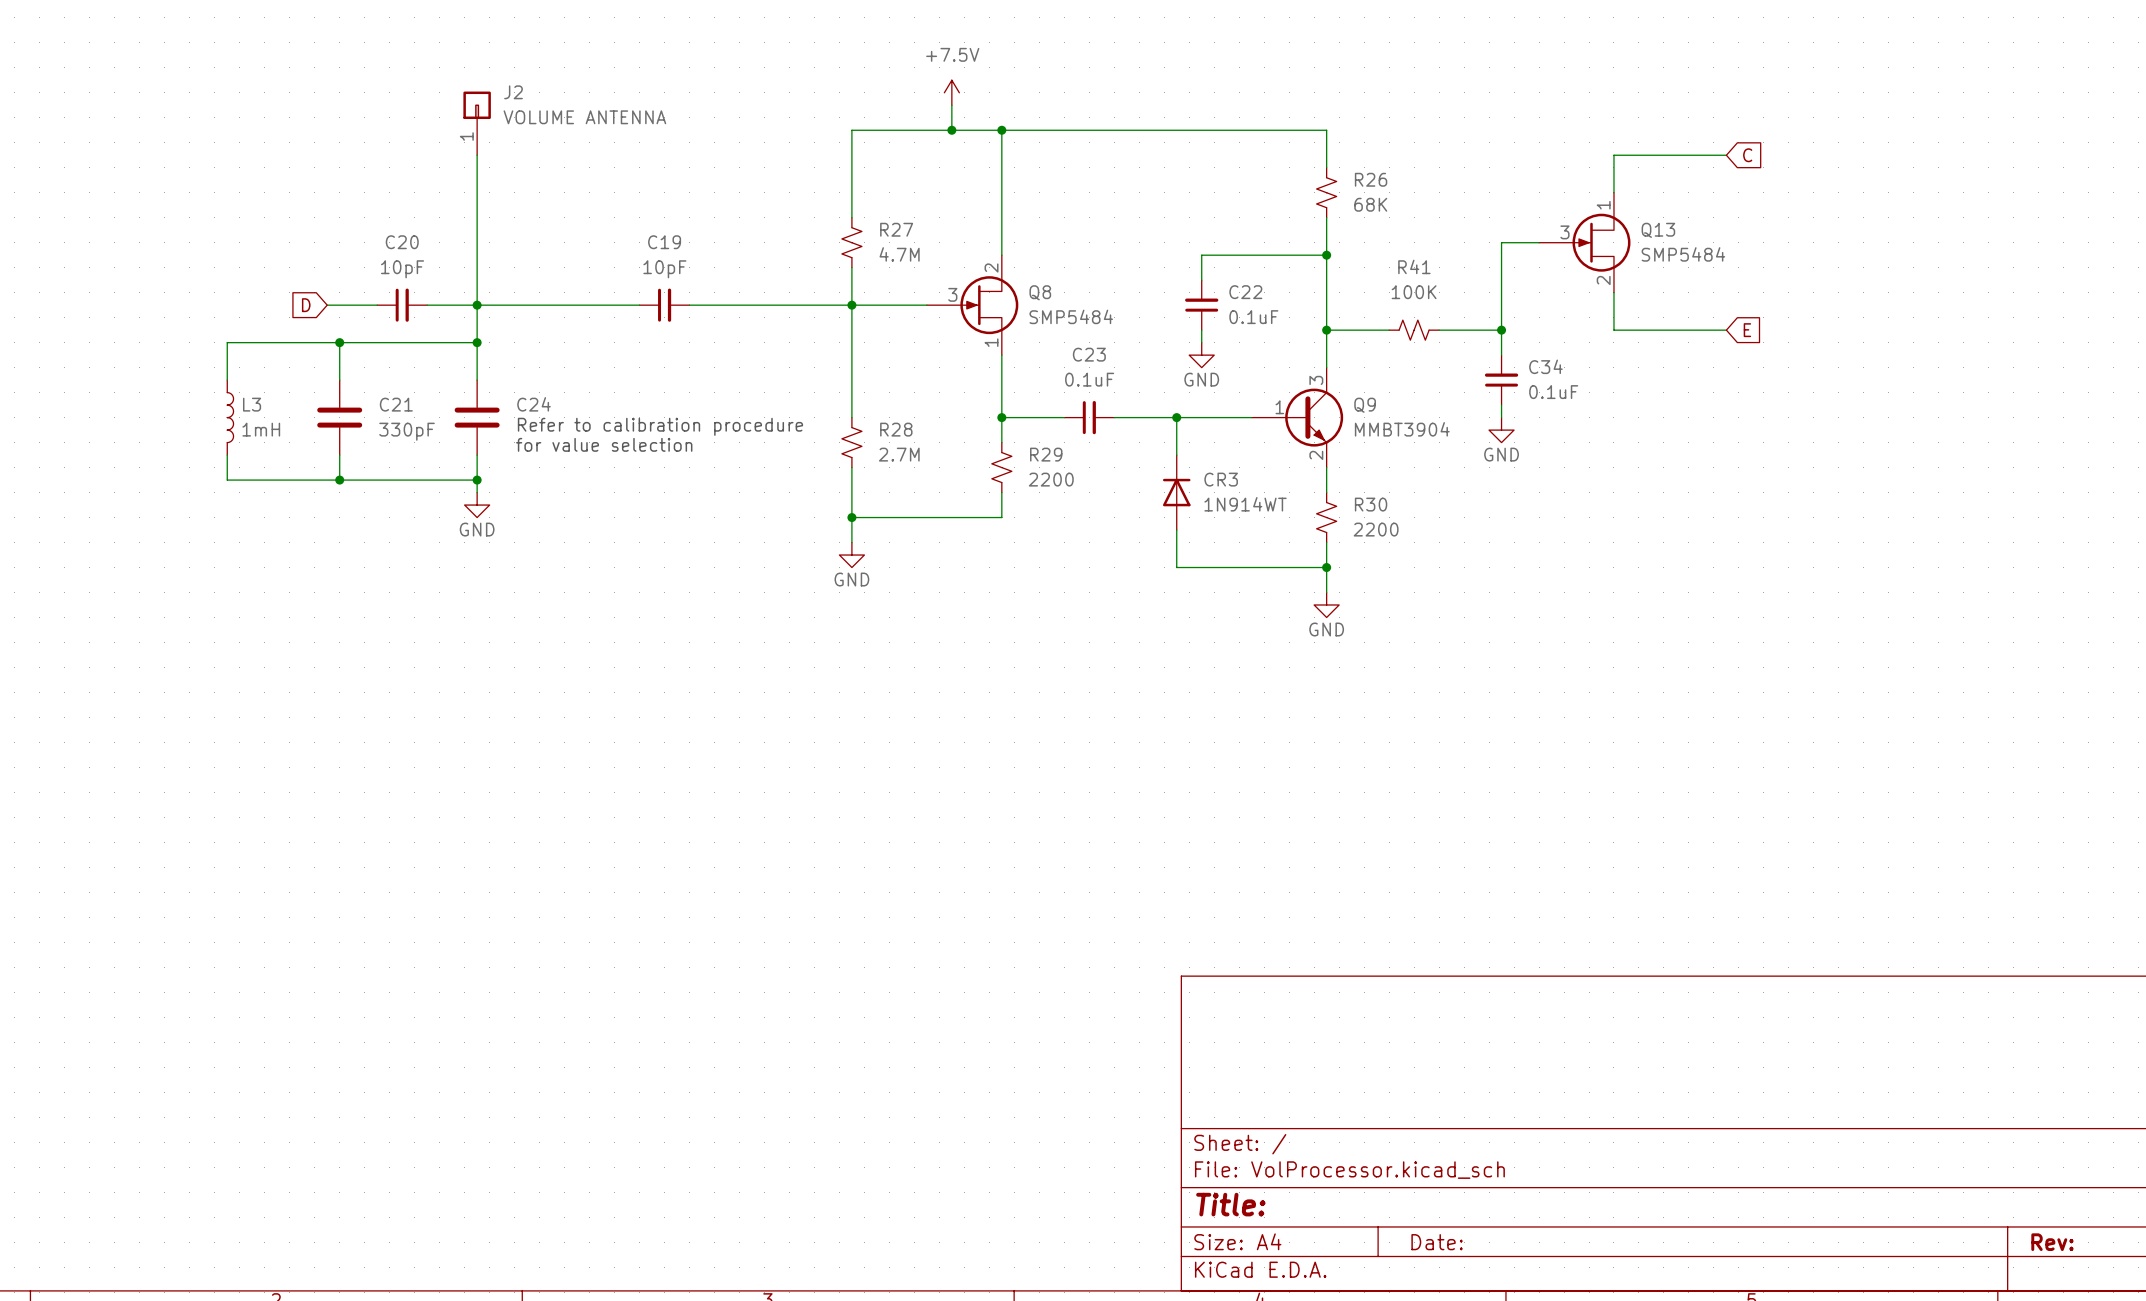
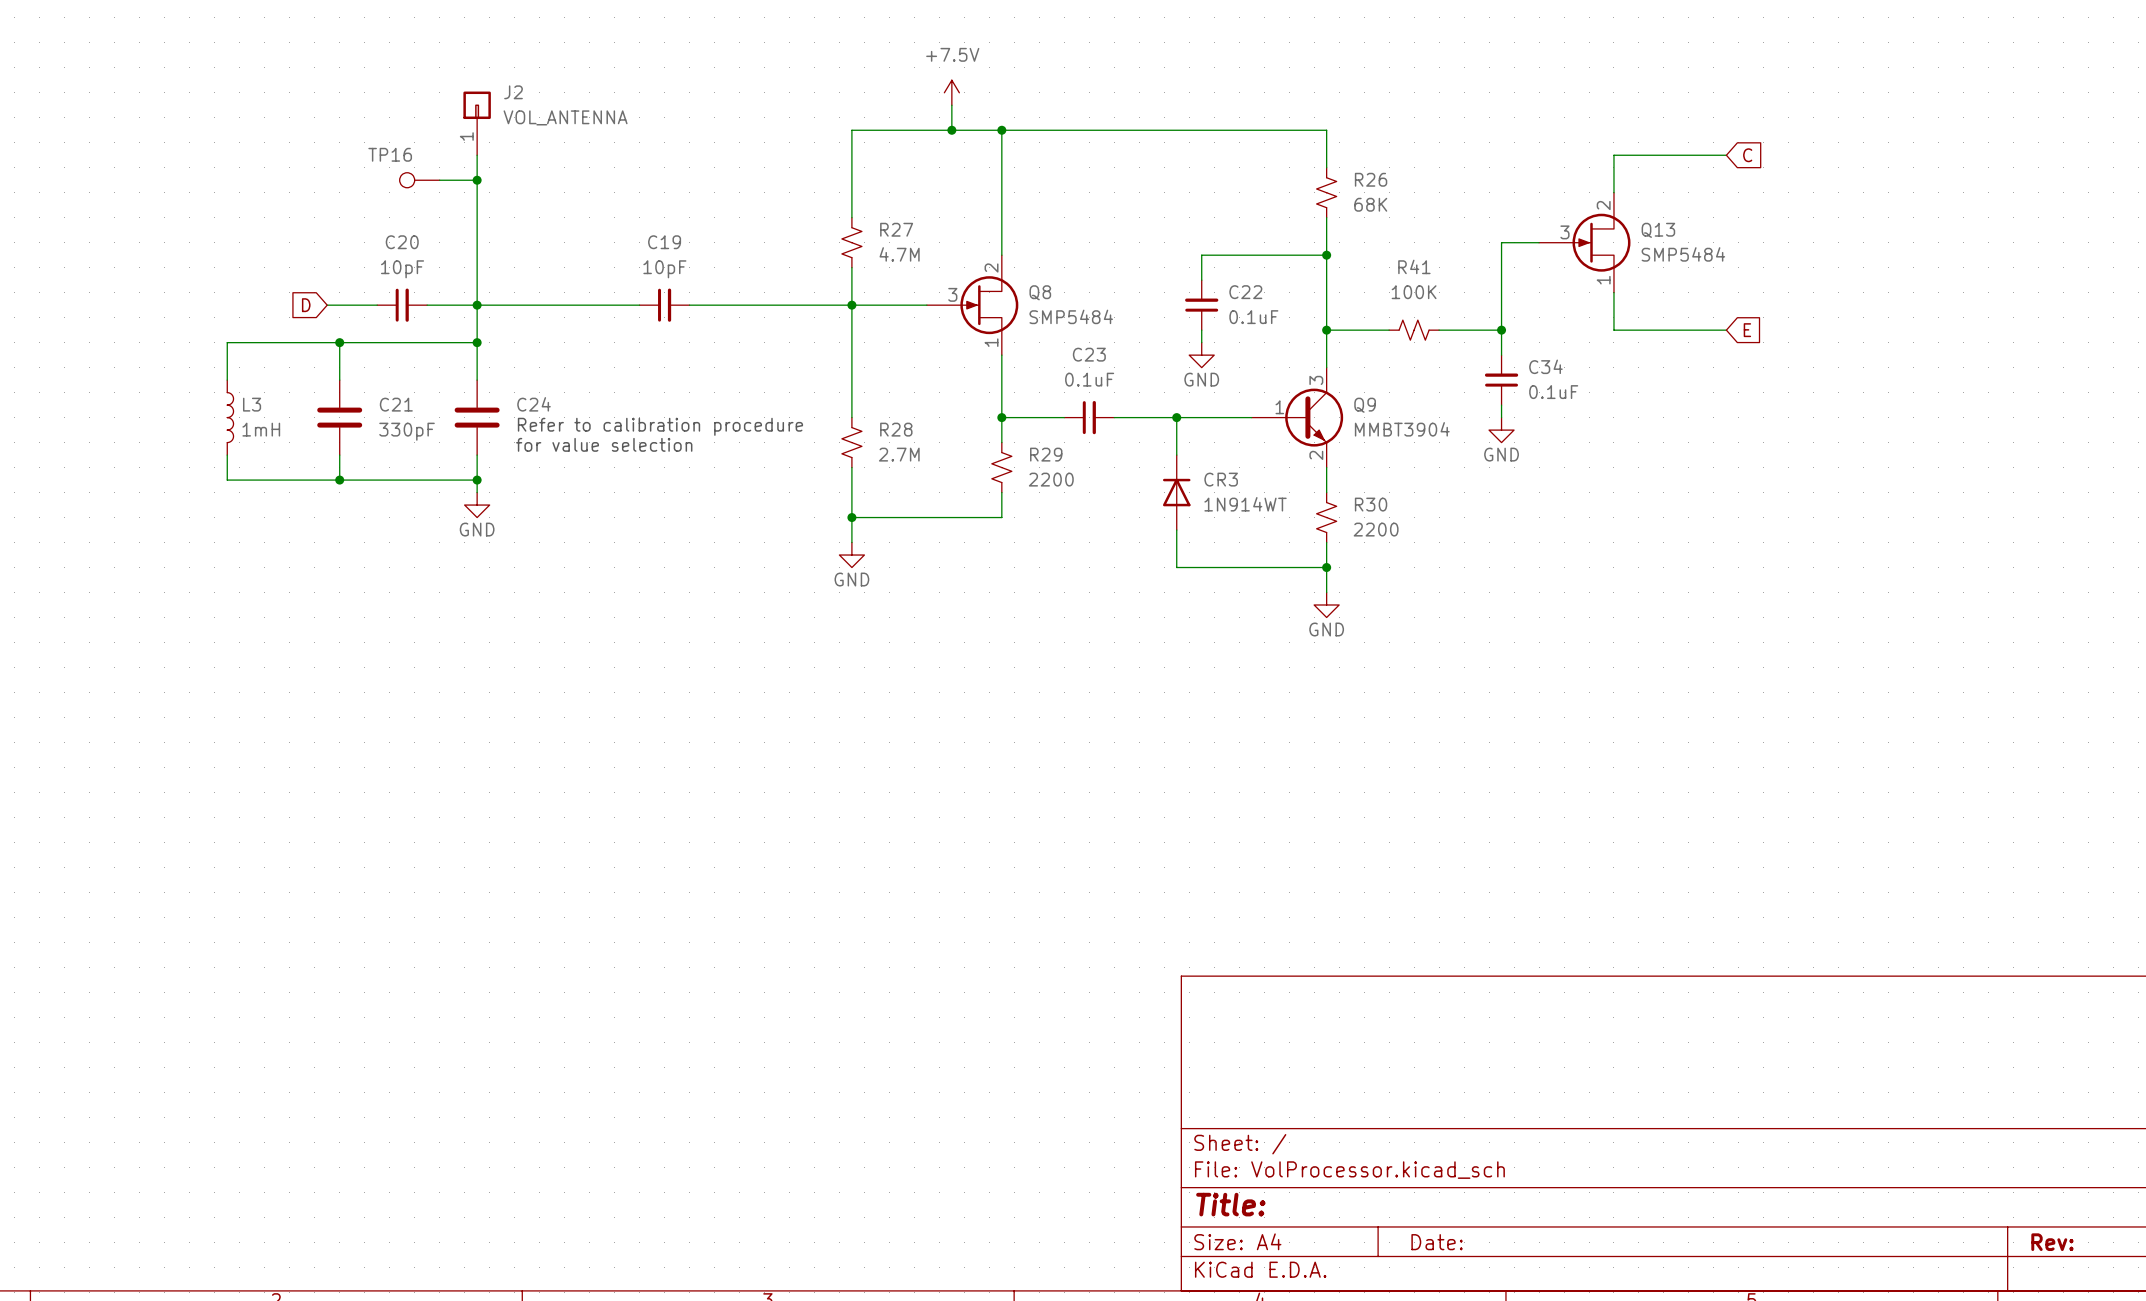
J2 value: VOLUME ANTENNA (584, 117) -> VOL_ANTENNA (565, 117)
TP16: none -> (419, 180)
wire: none -> (439, 180) (477, 180)
junction: none -> (477, 180)
Q13 flip: as is (1601, 242) -> up-down (1601, 242)

